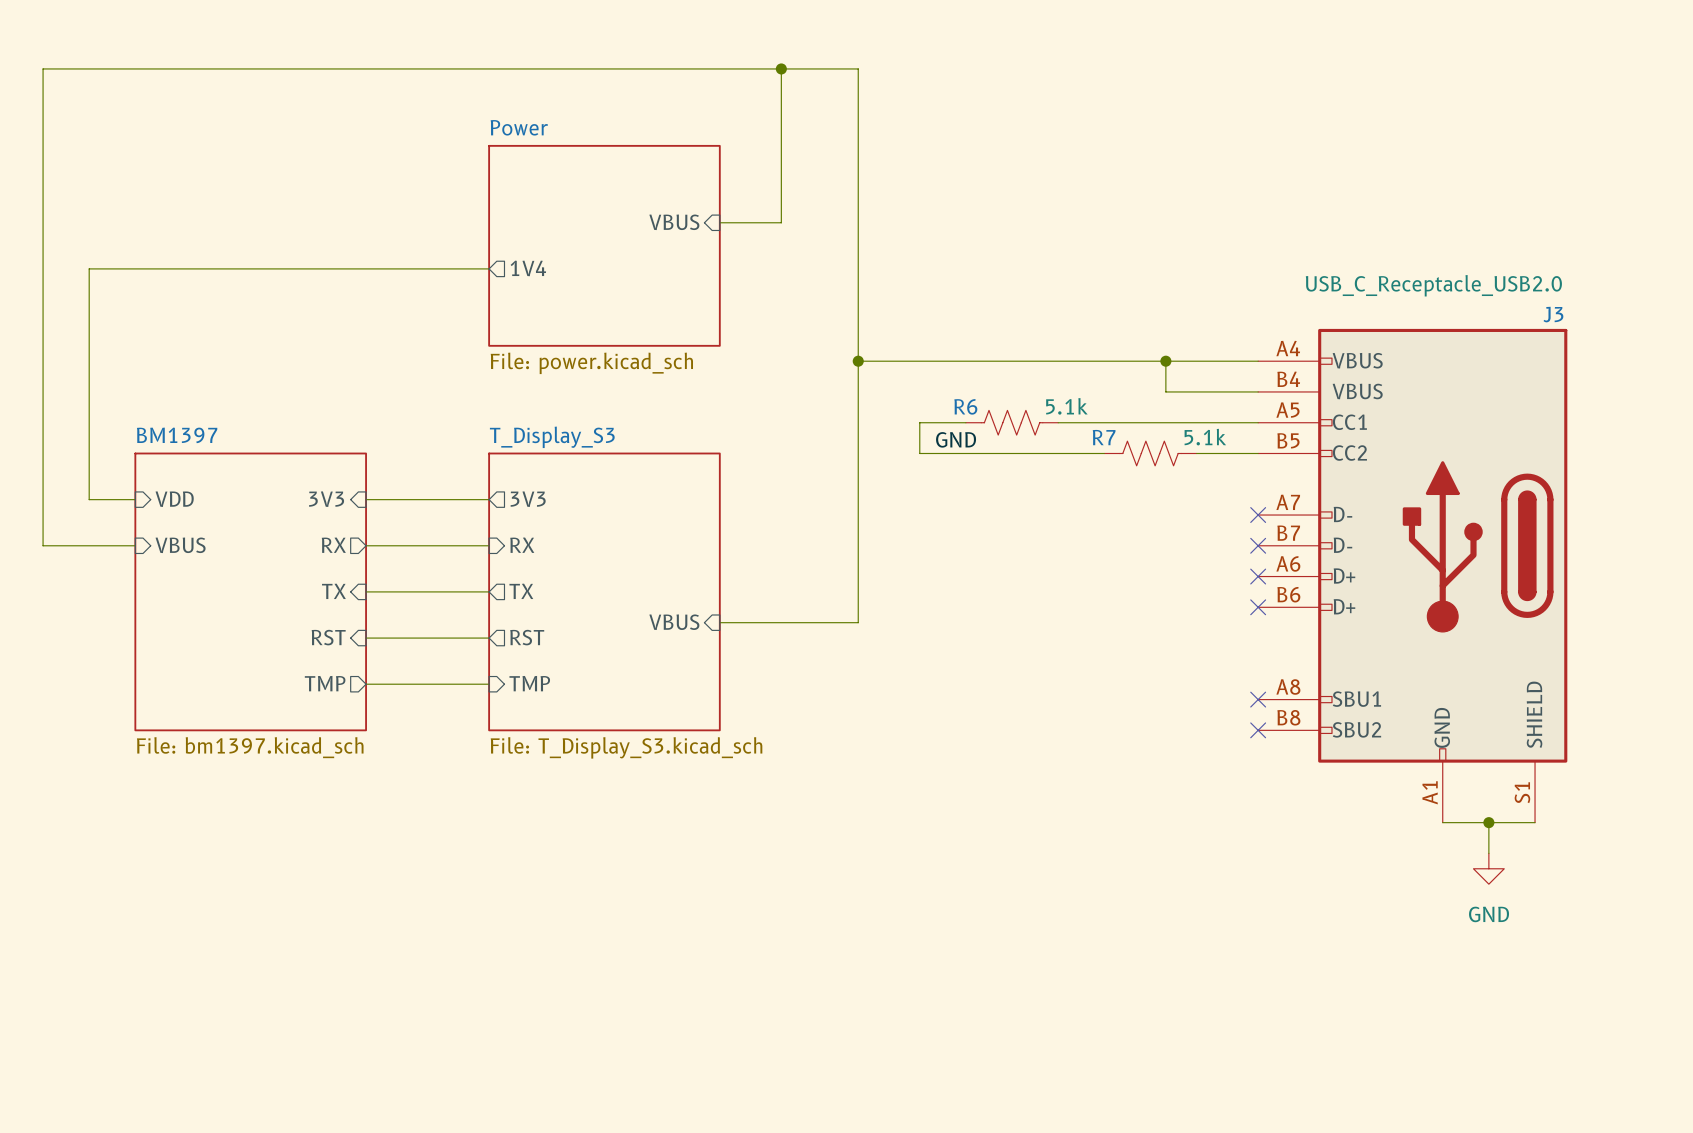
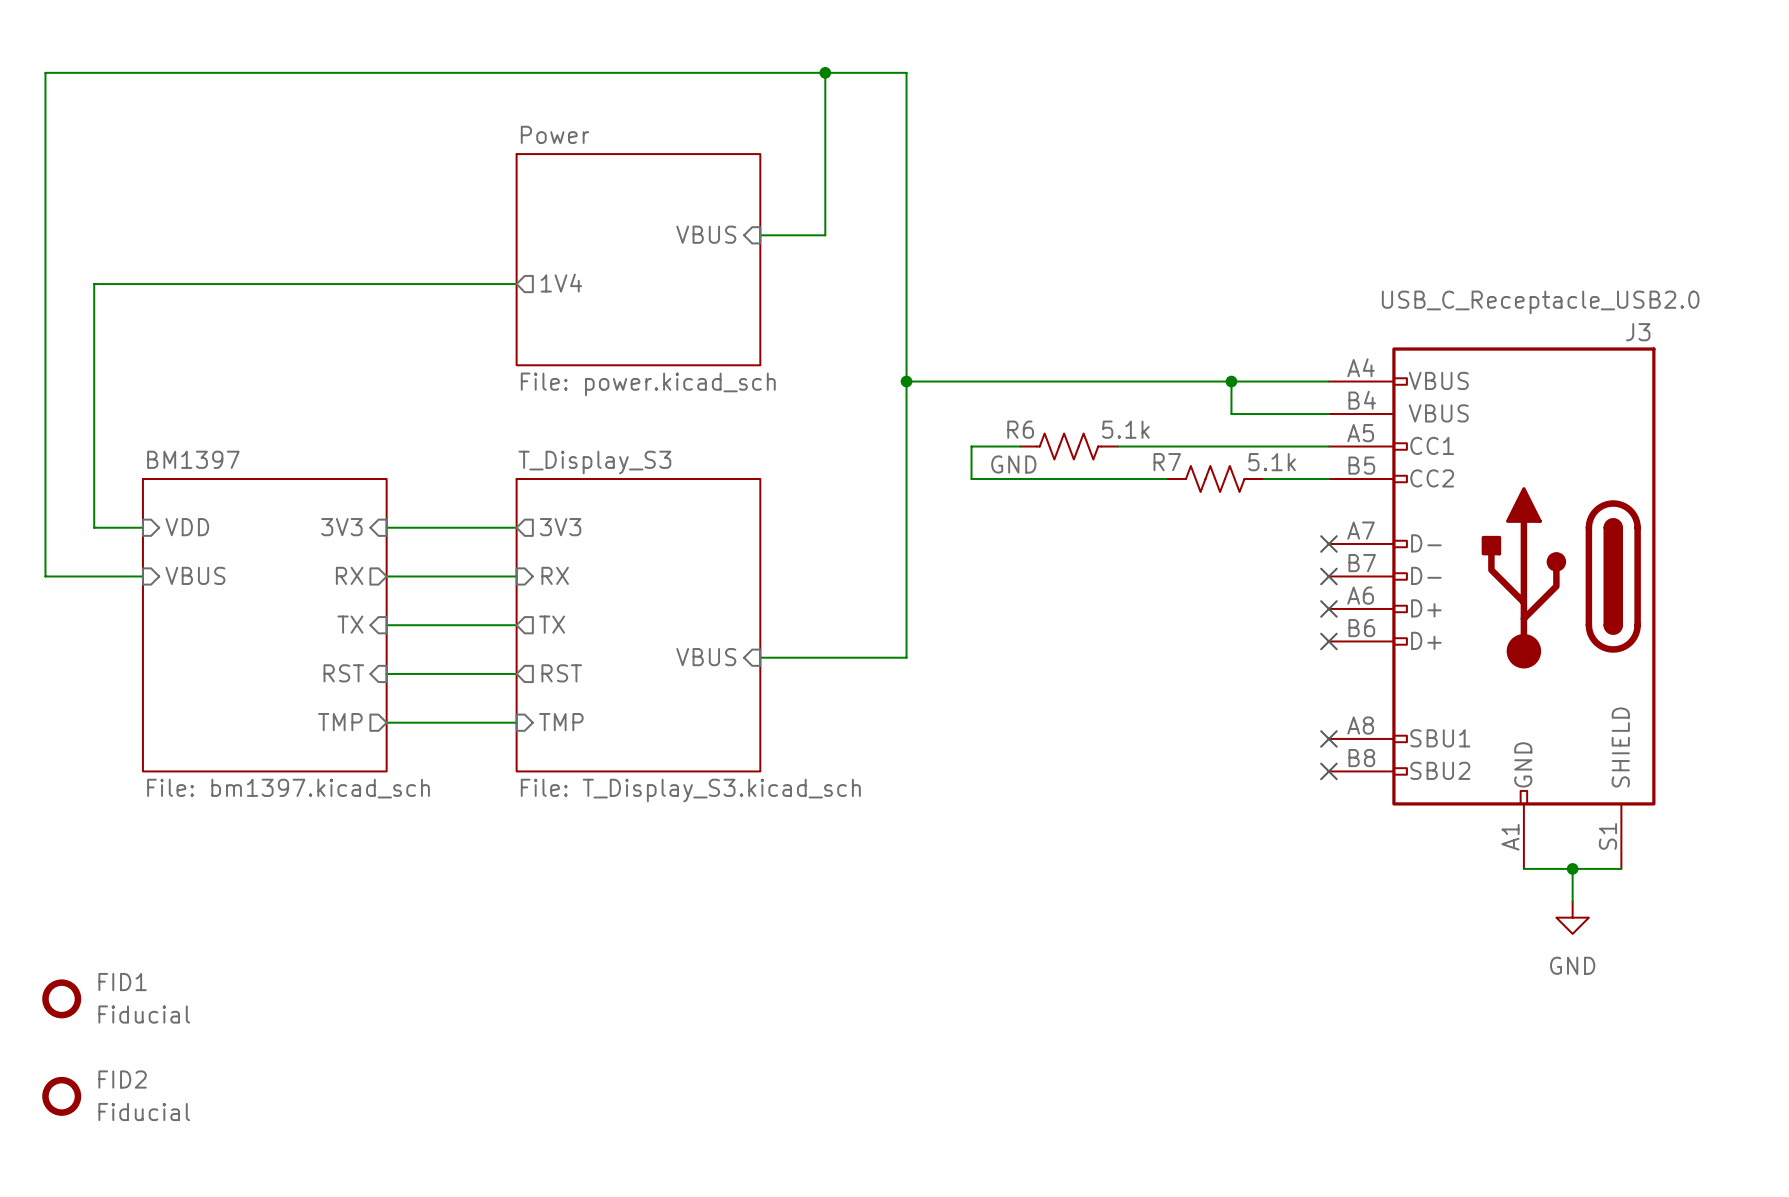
FID1: none -> Fiducial (61, 998)
FID2: none -> Fiducial (61, 1096)

